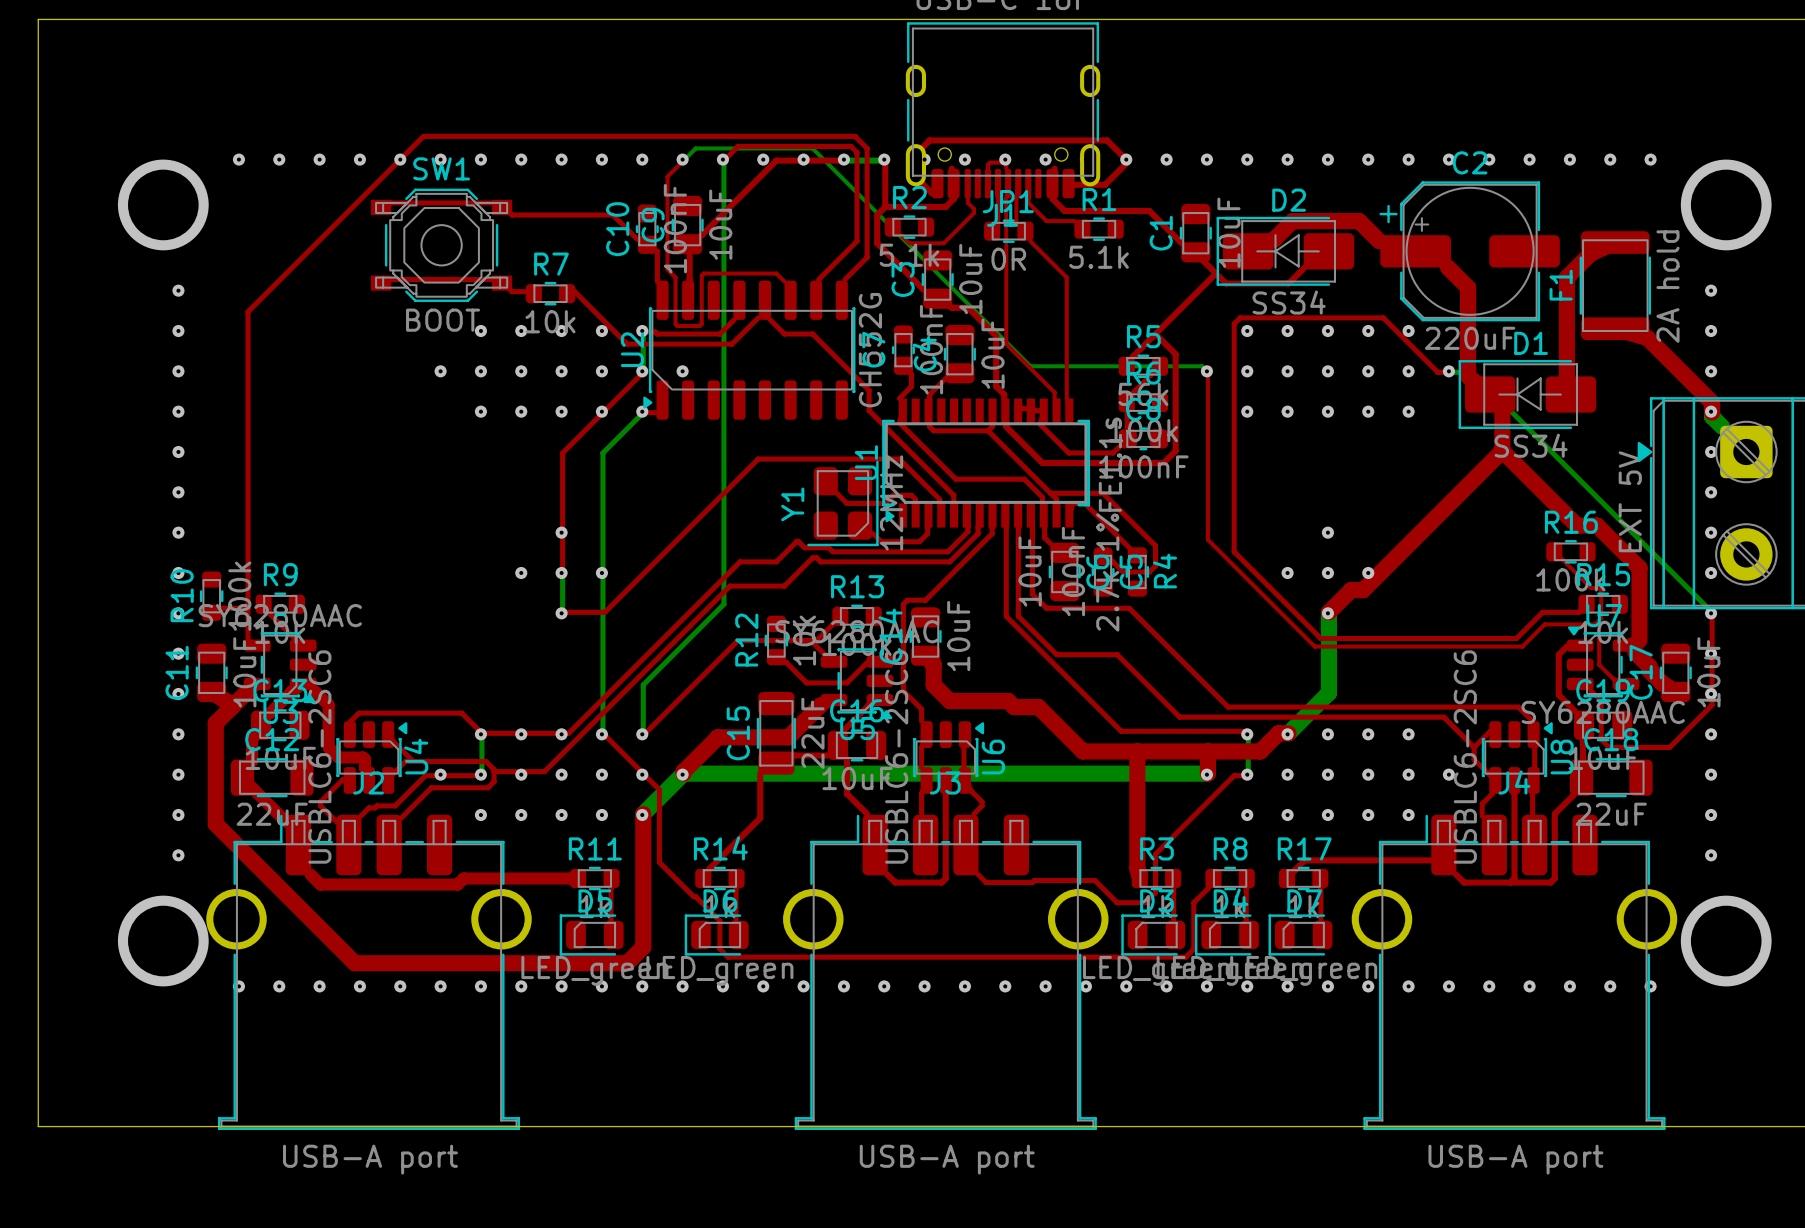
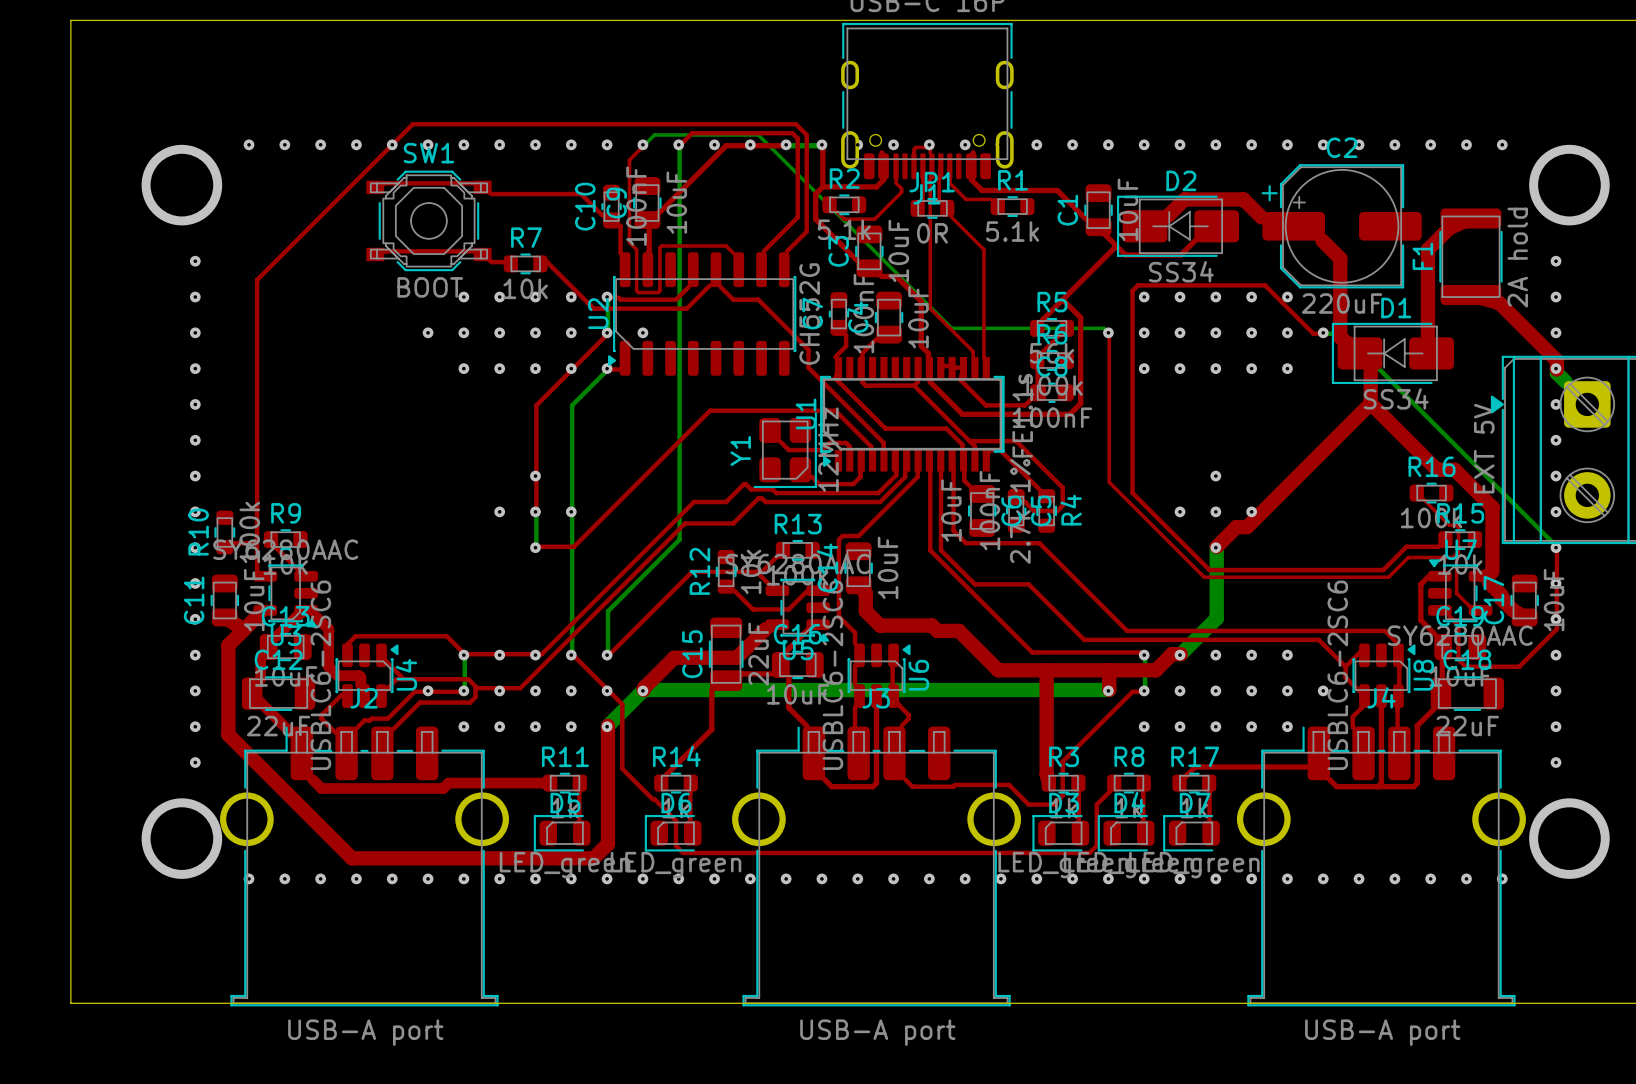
top track: (937, 183) (931, 192) (919, 180) (919, 150) (929, 140) (1107, 140) (1127, 160) (1105, 184) (1068, 183) -> none

